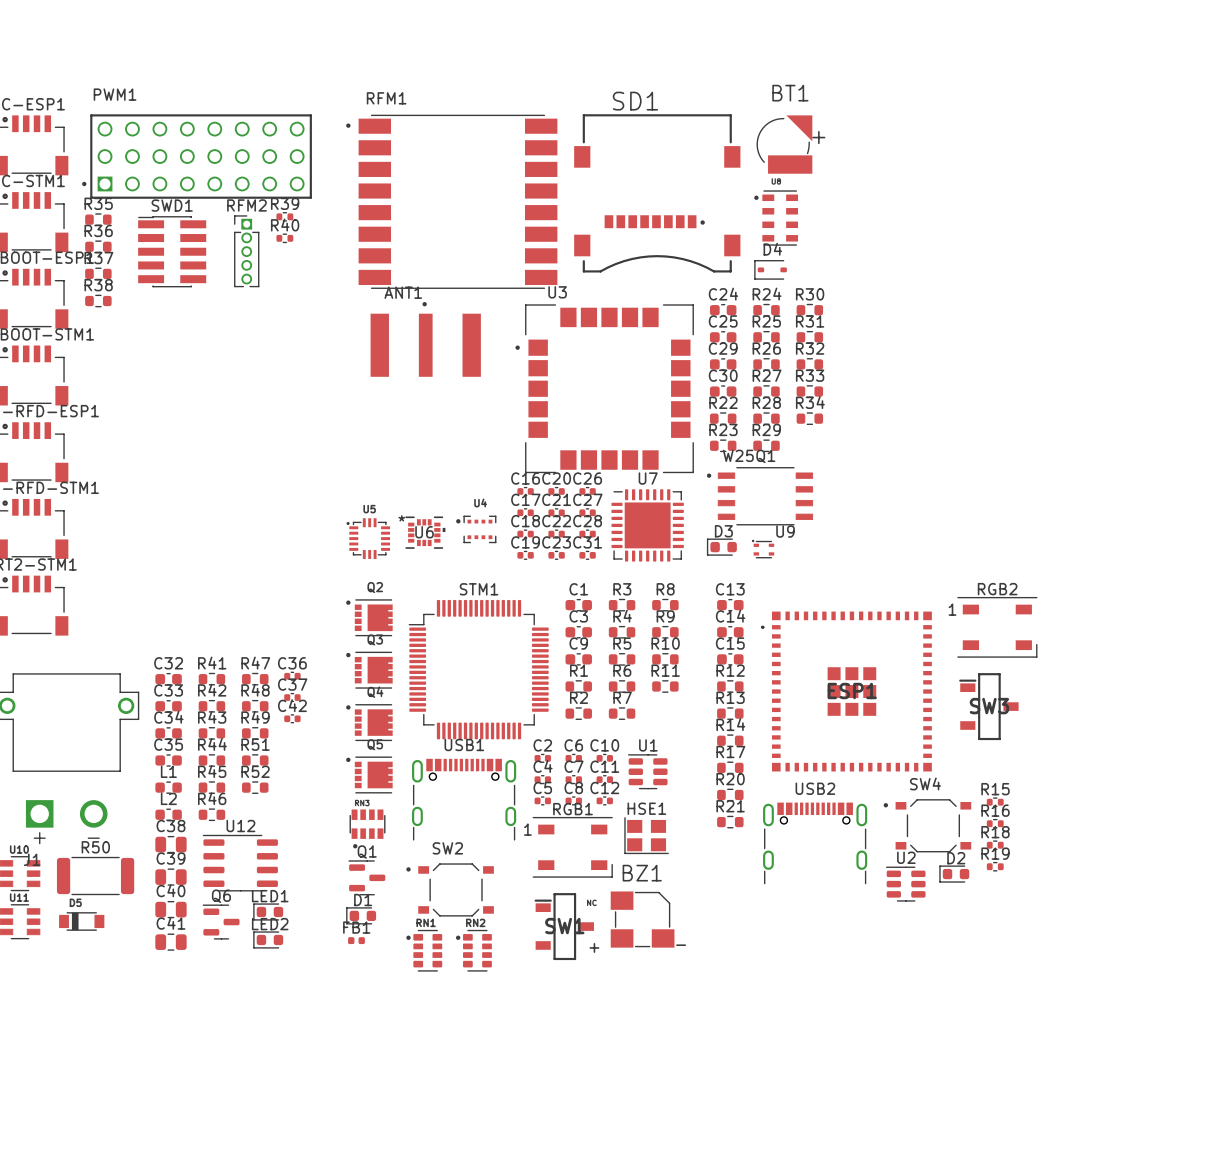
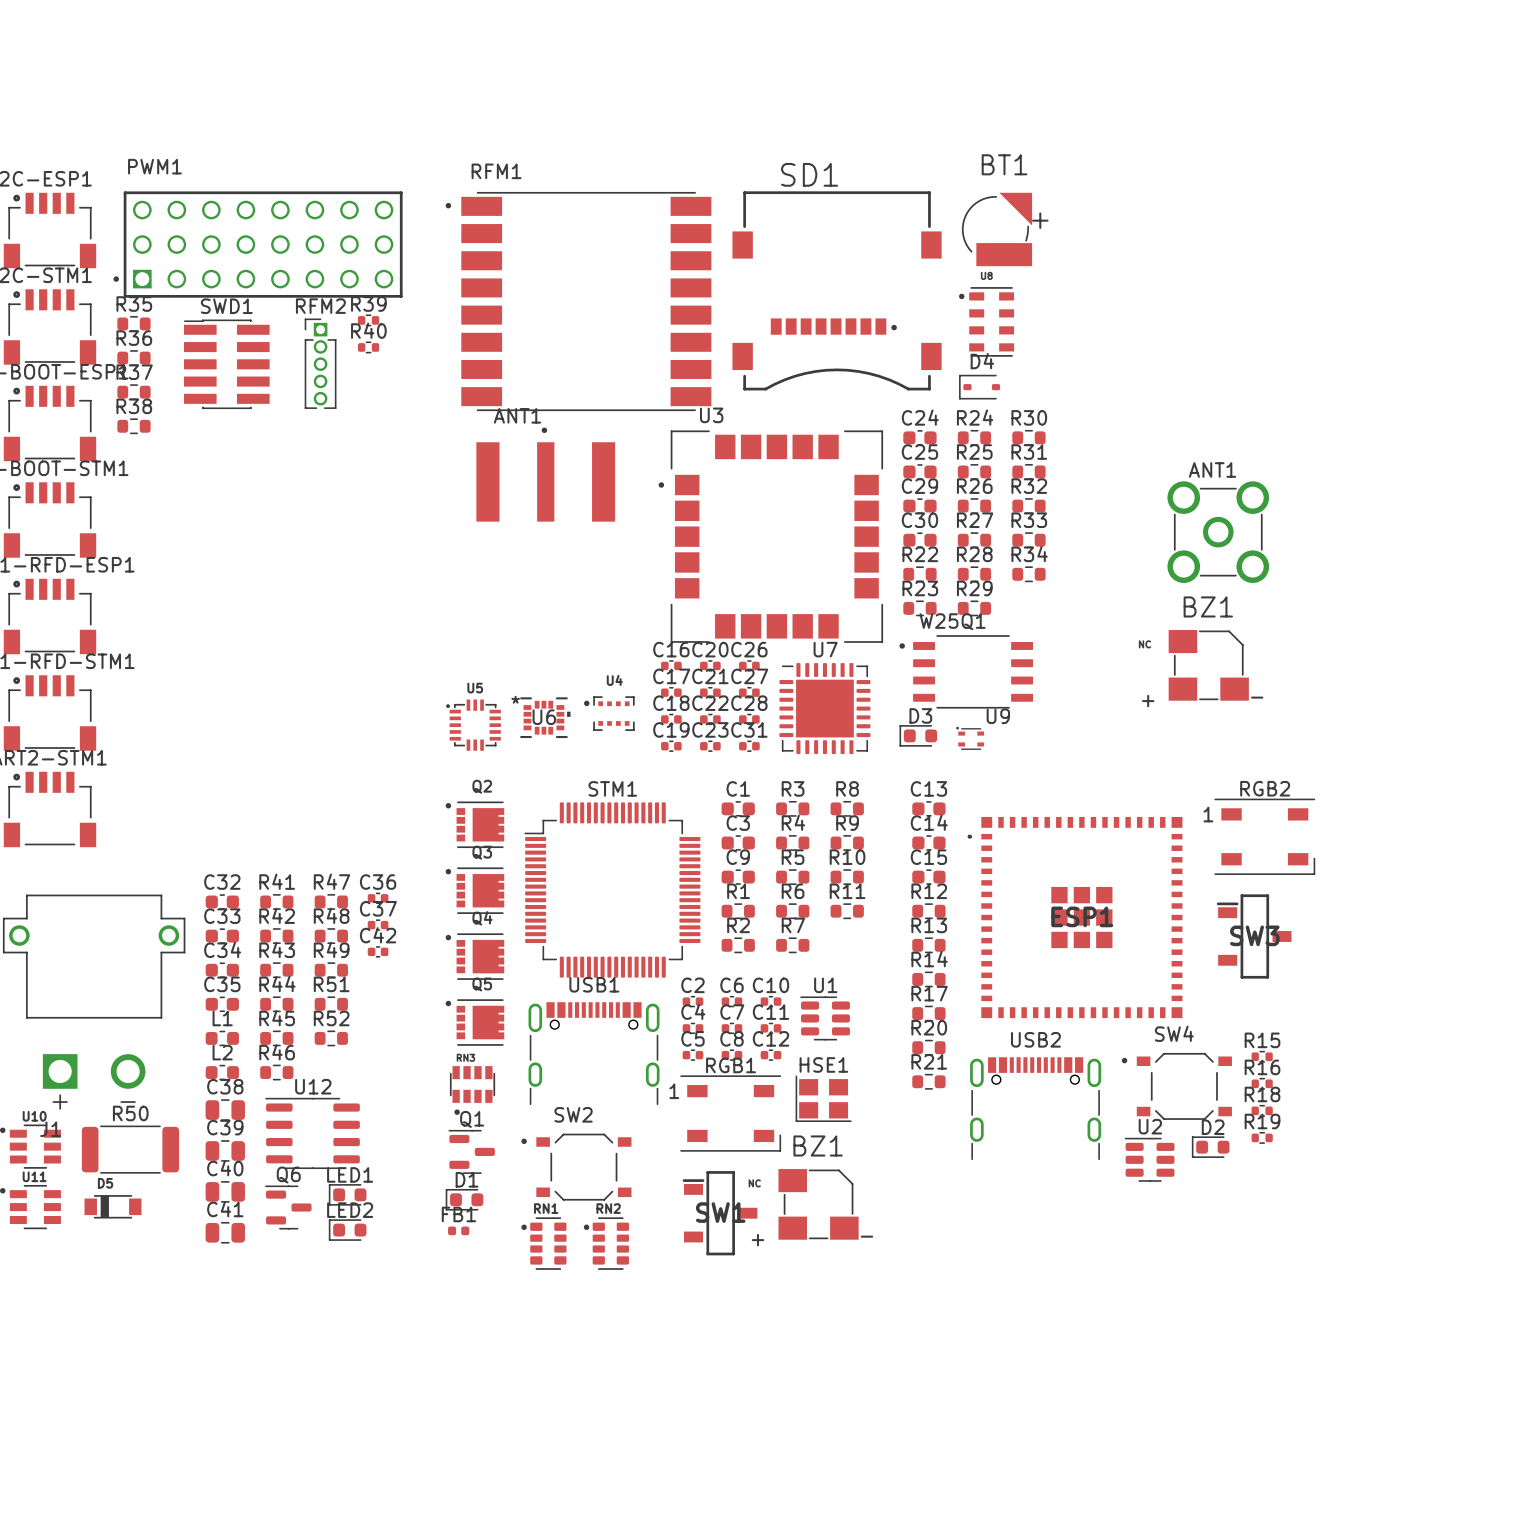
ANT1: none -> (1218, 532)
BZ1: none -> (1208, 665)

